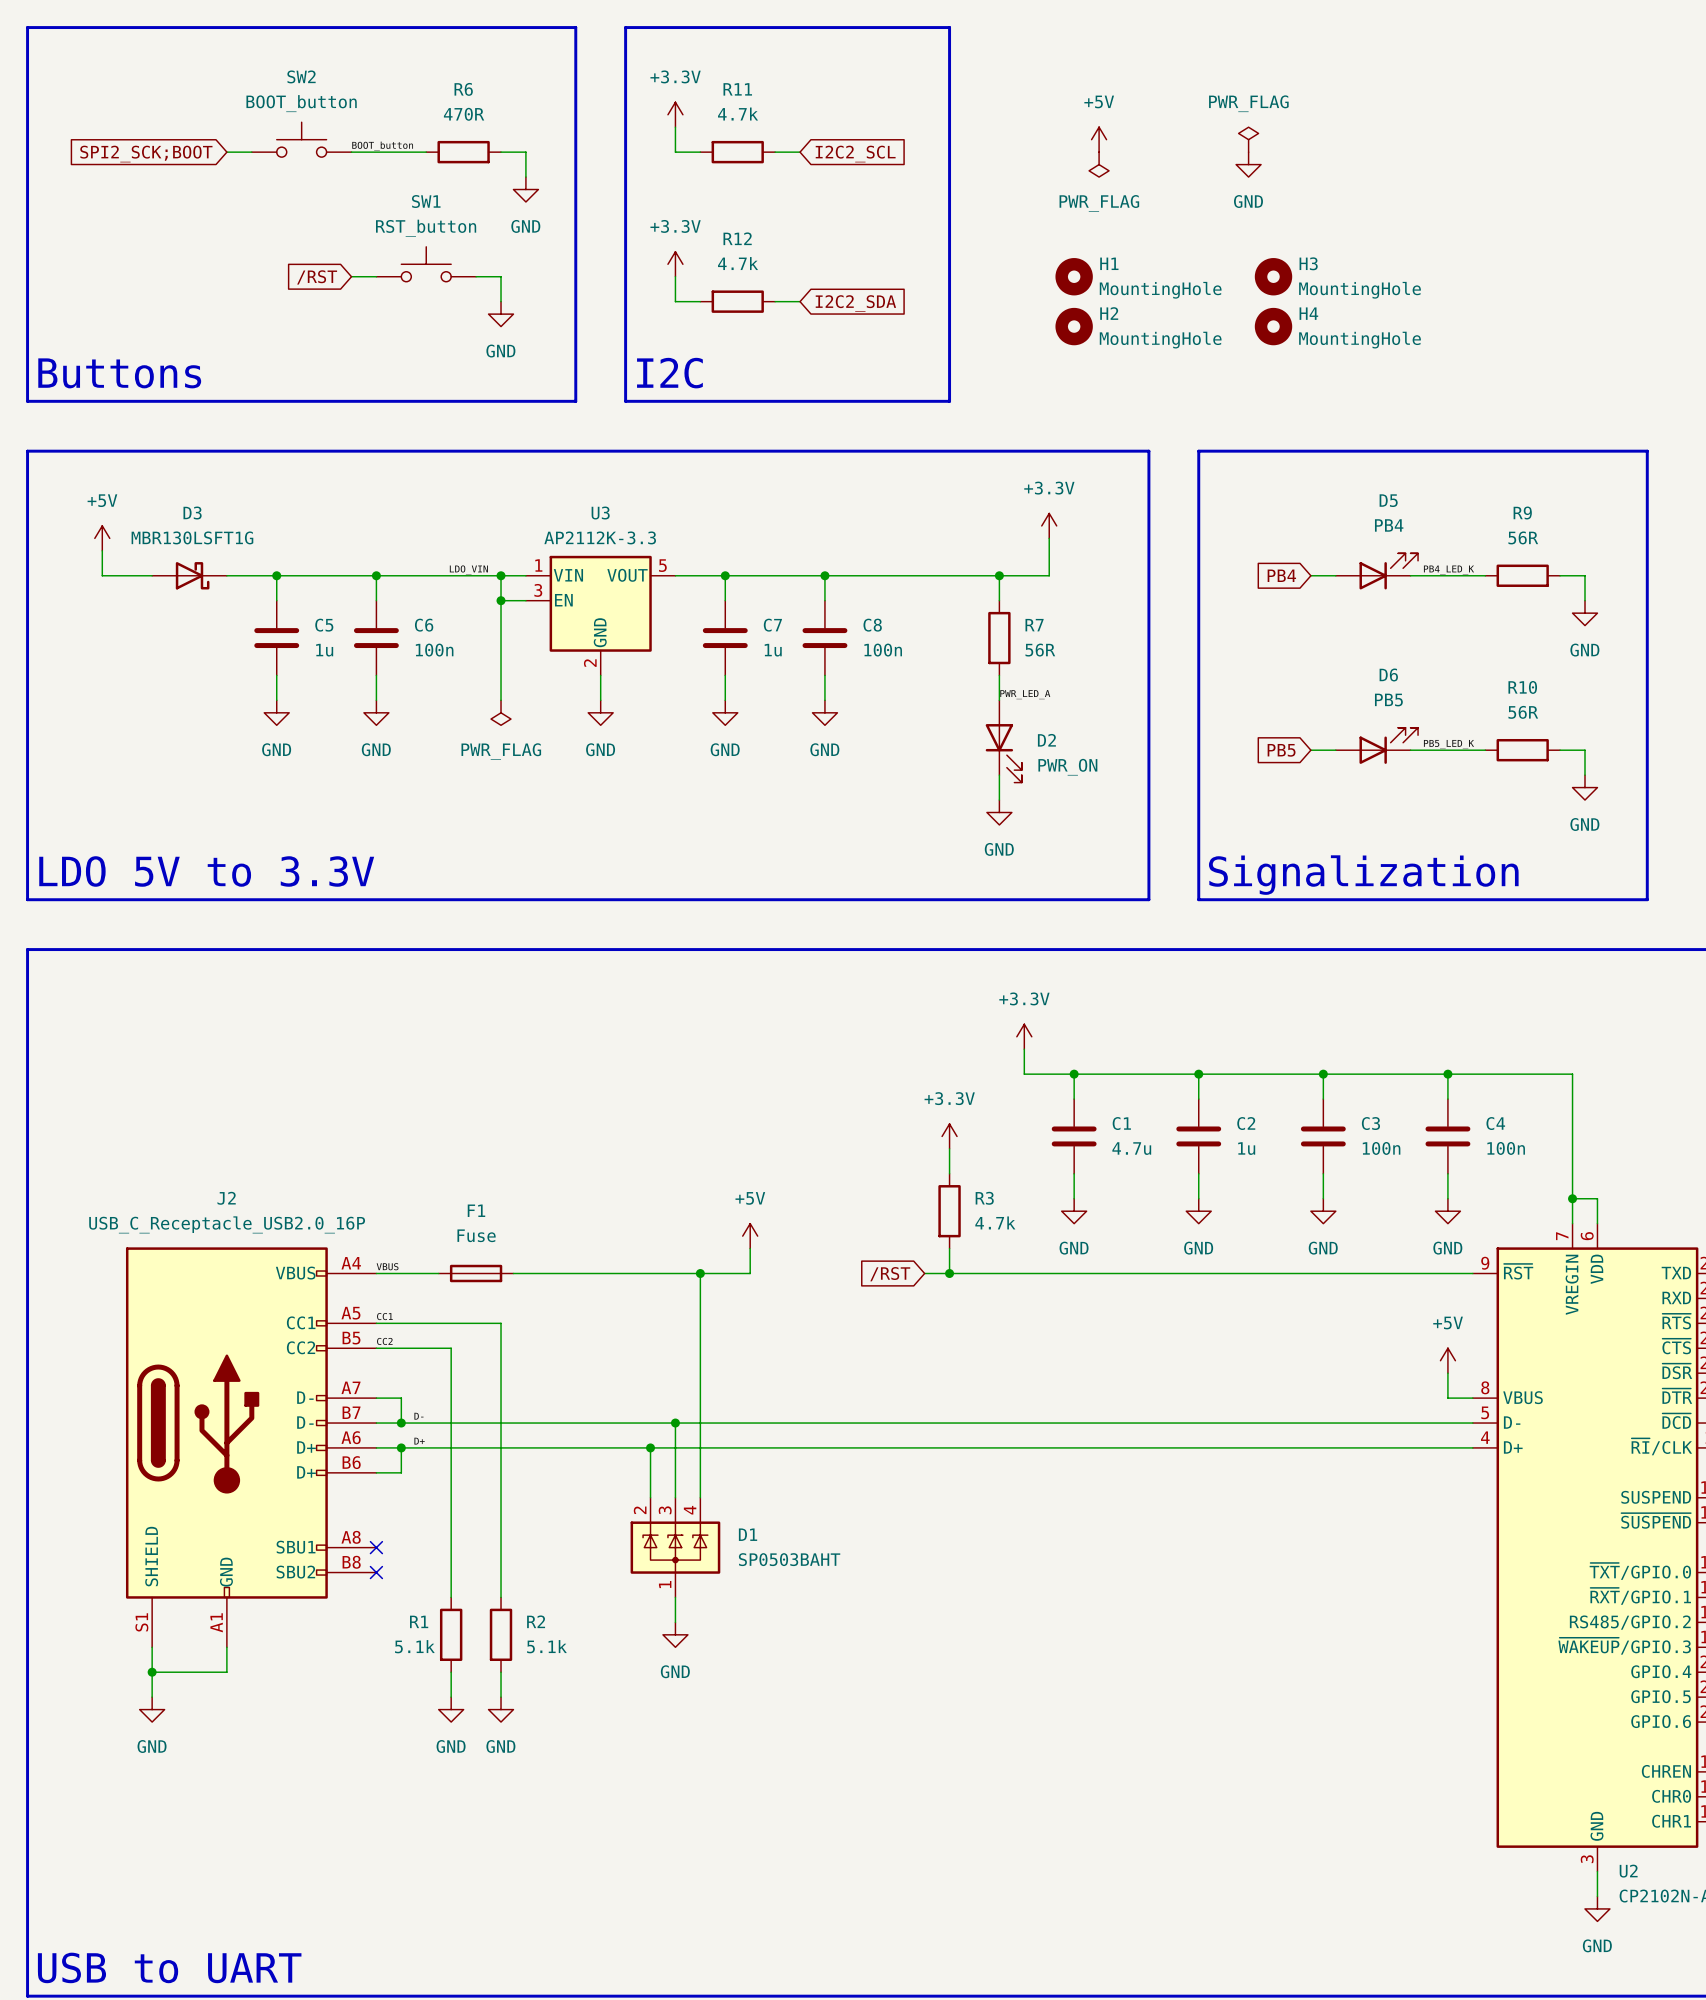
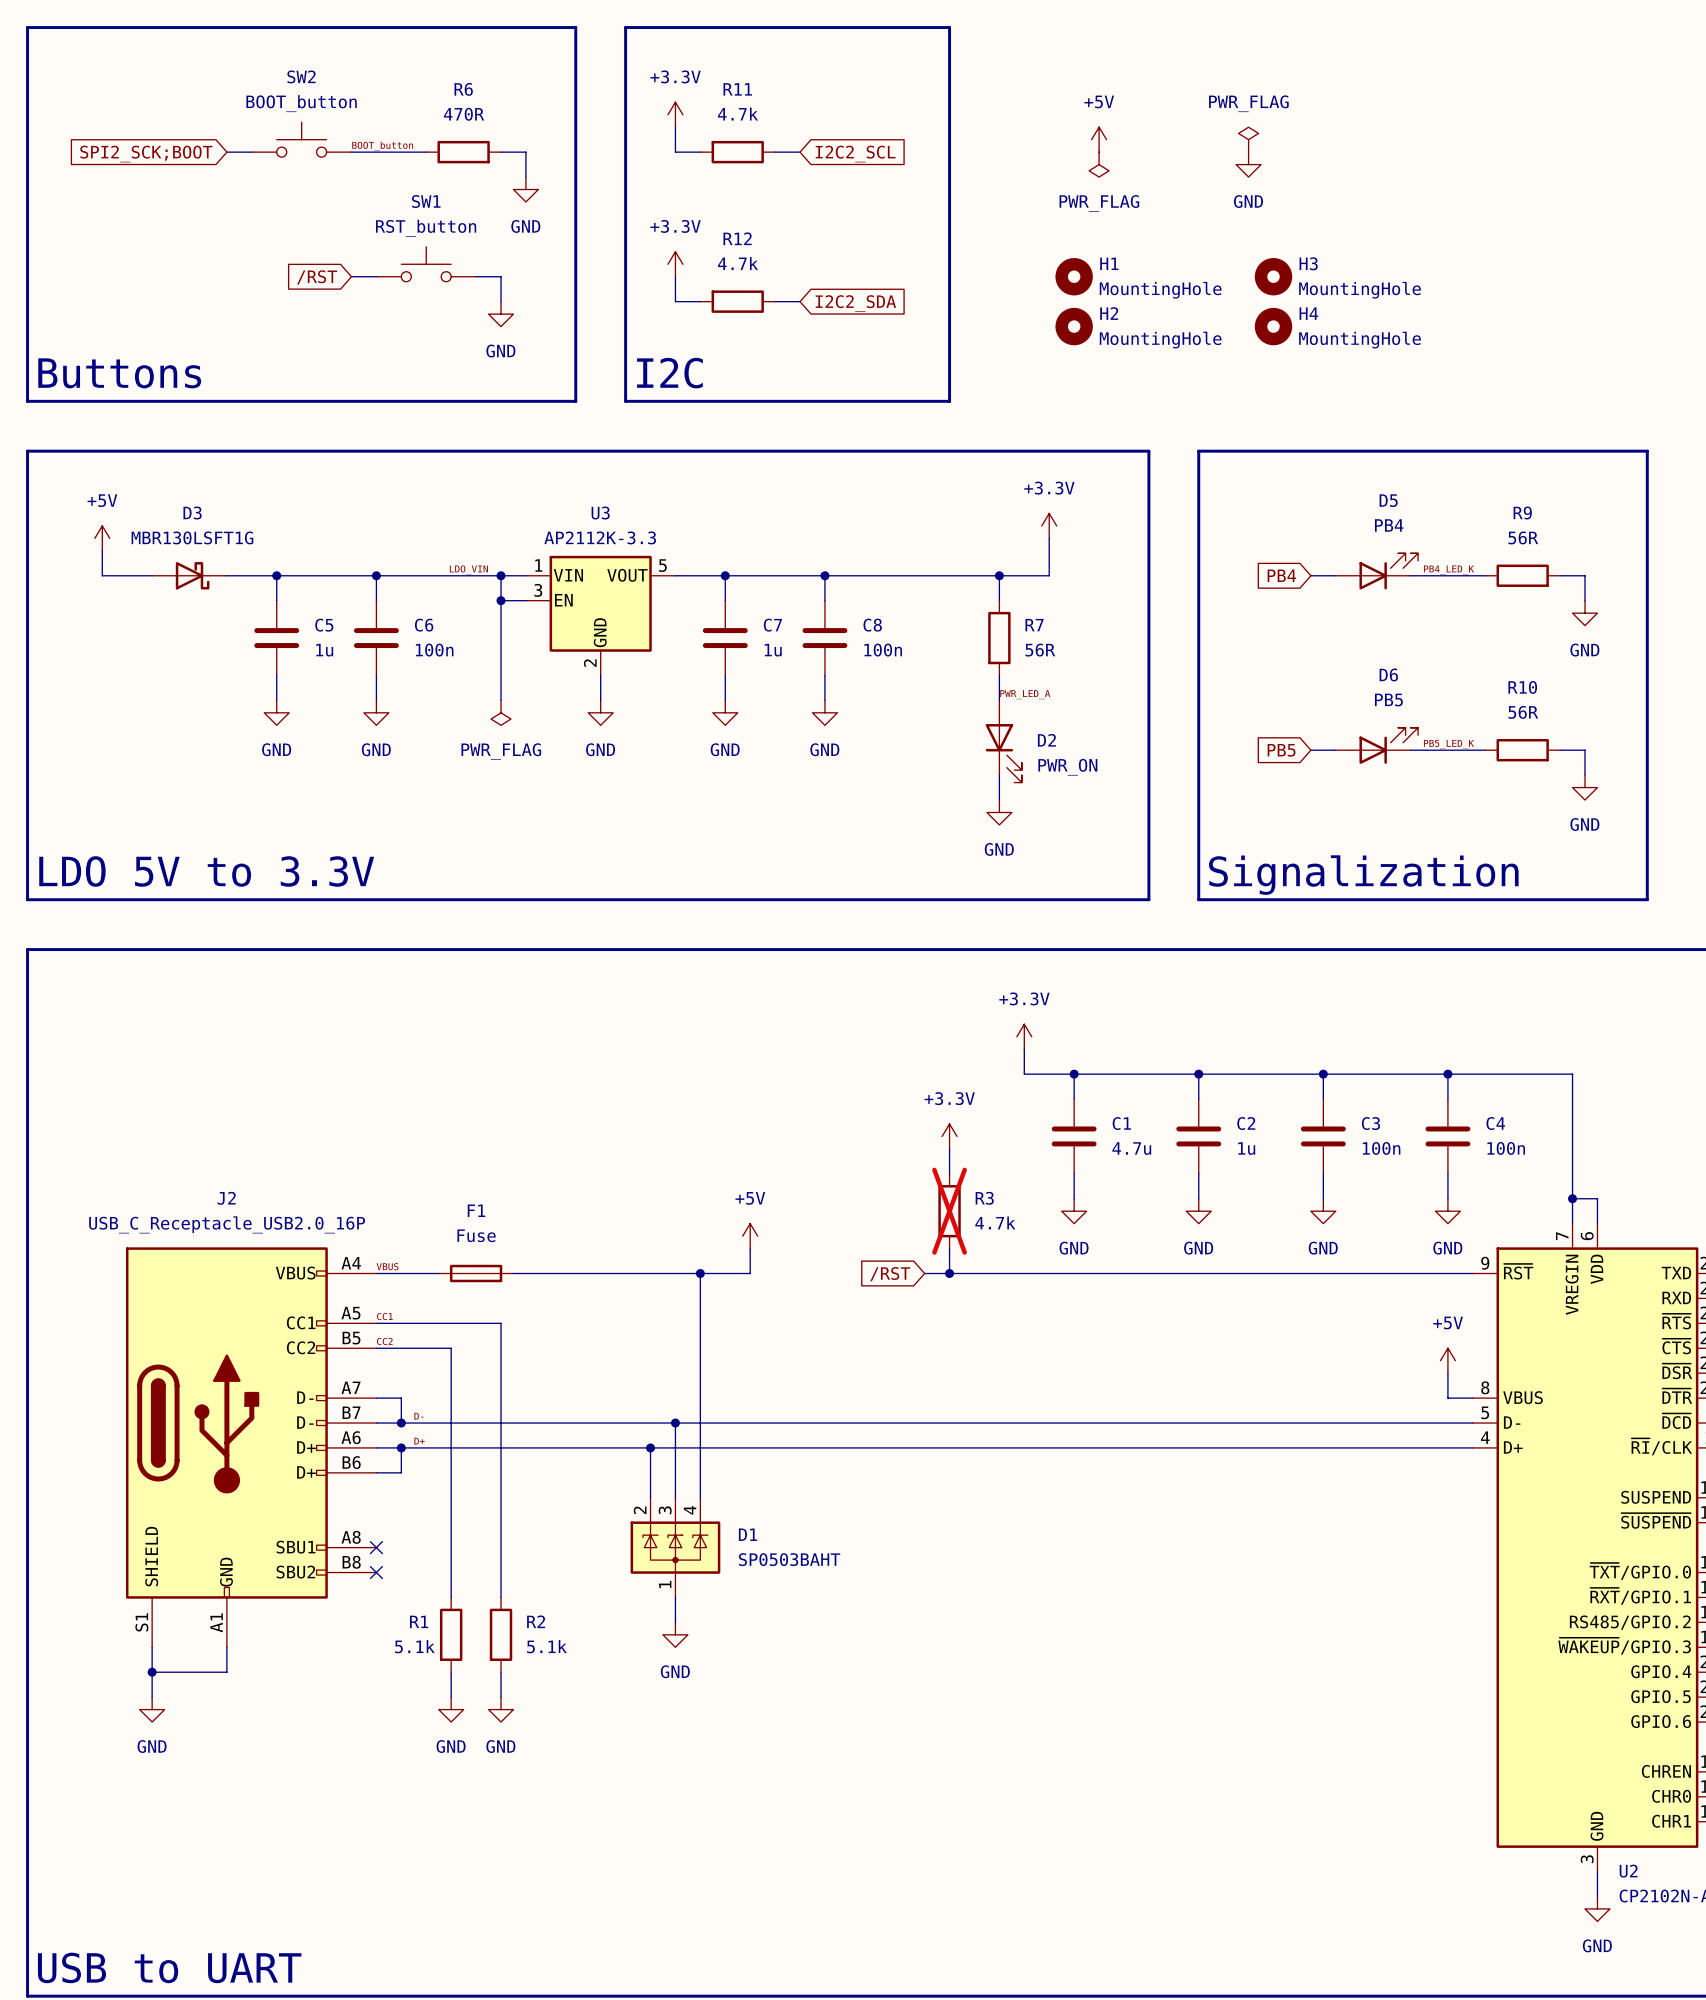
R3 do-not-place cross: none -> (949, 1211)

